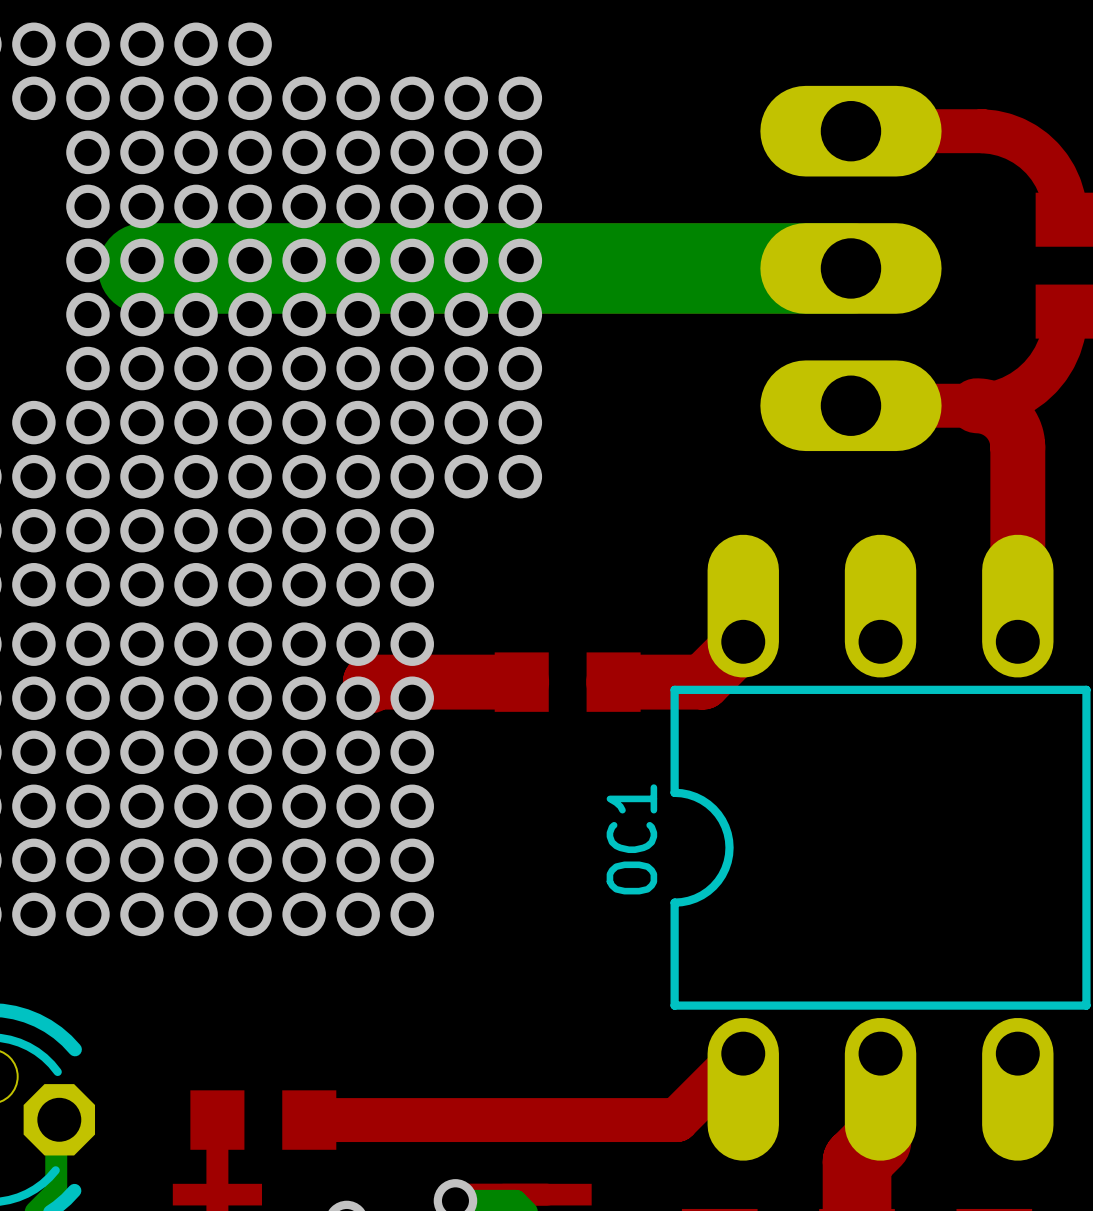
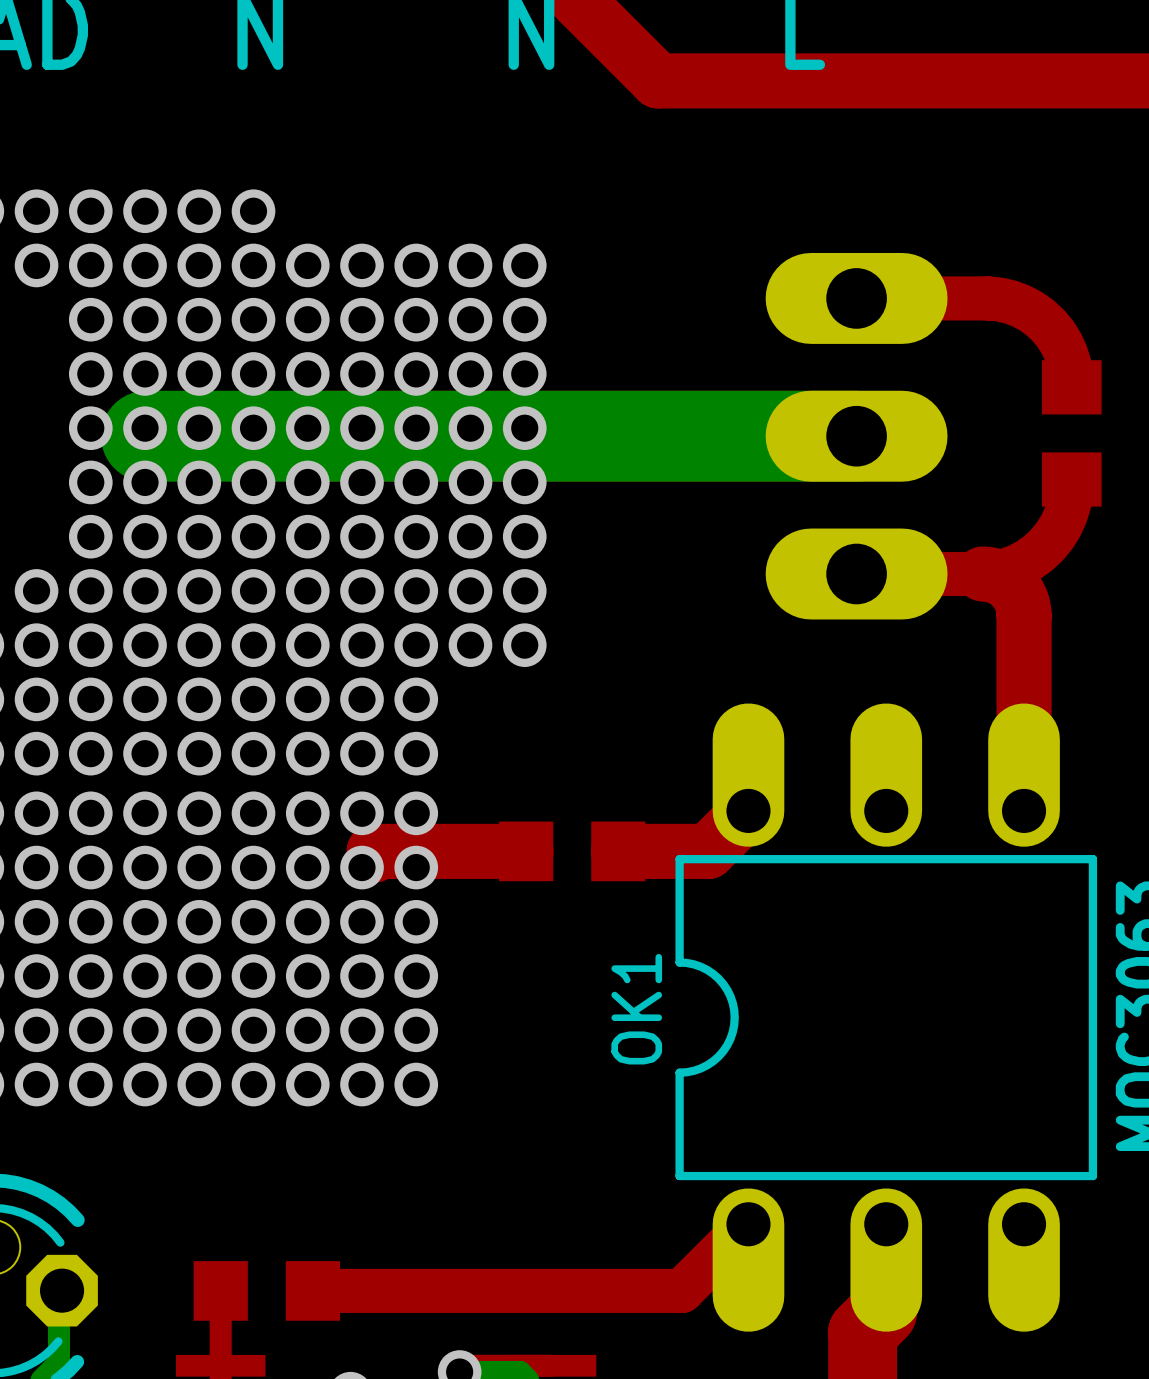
OC1 name: OC1 (631, 839) -> OK1 (636, 1009)

